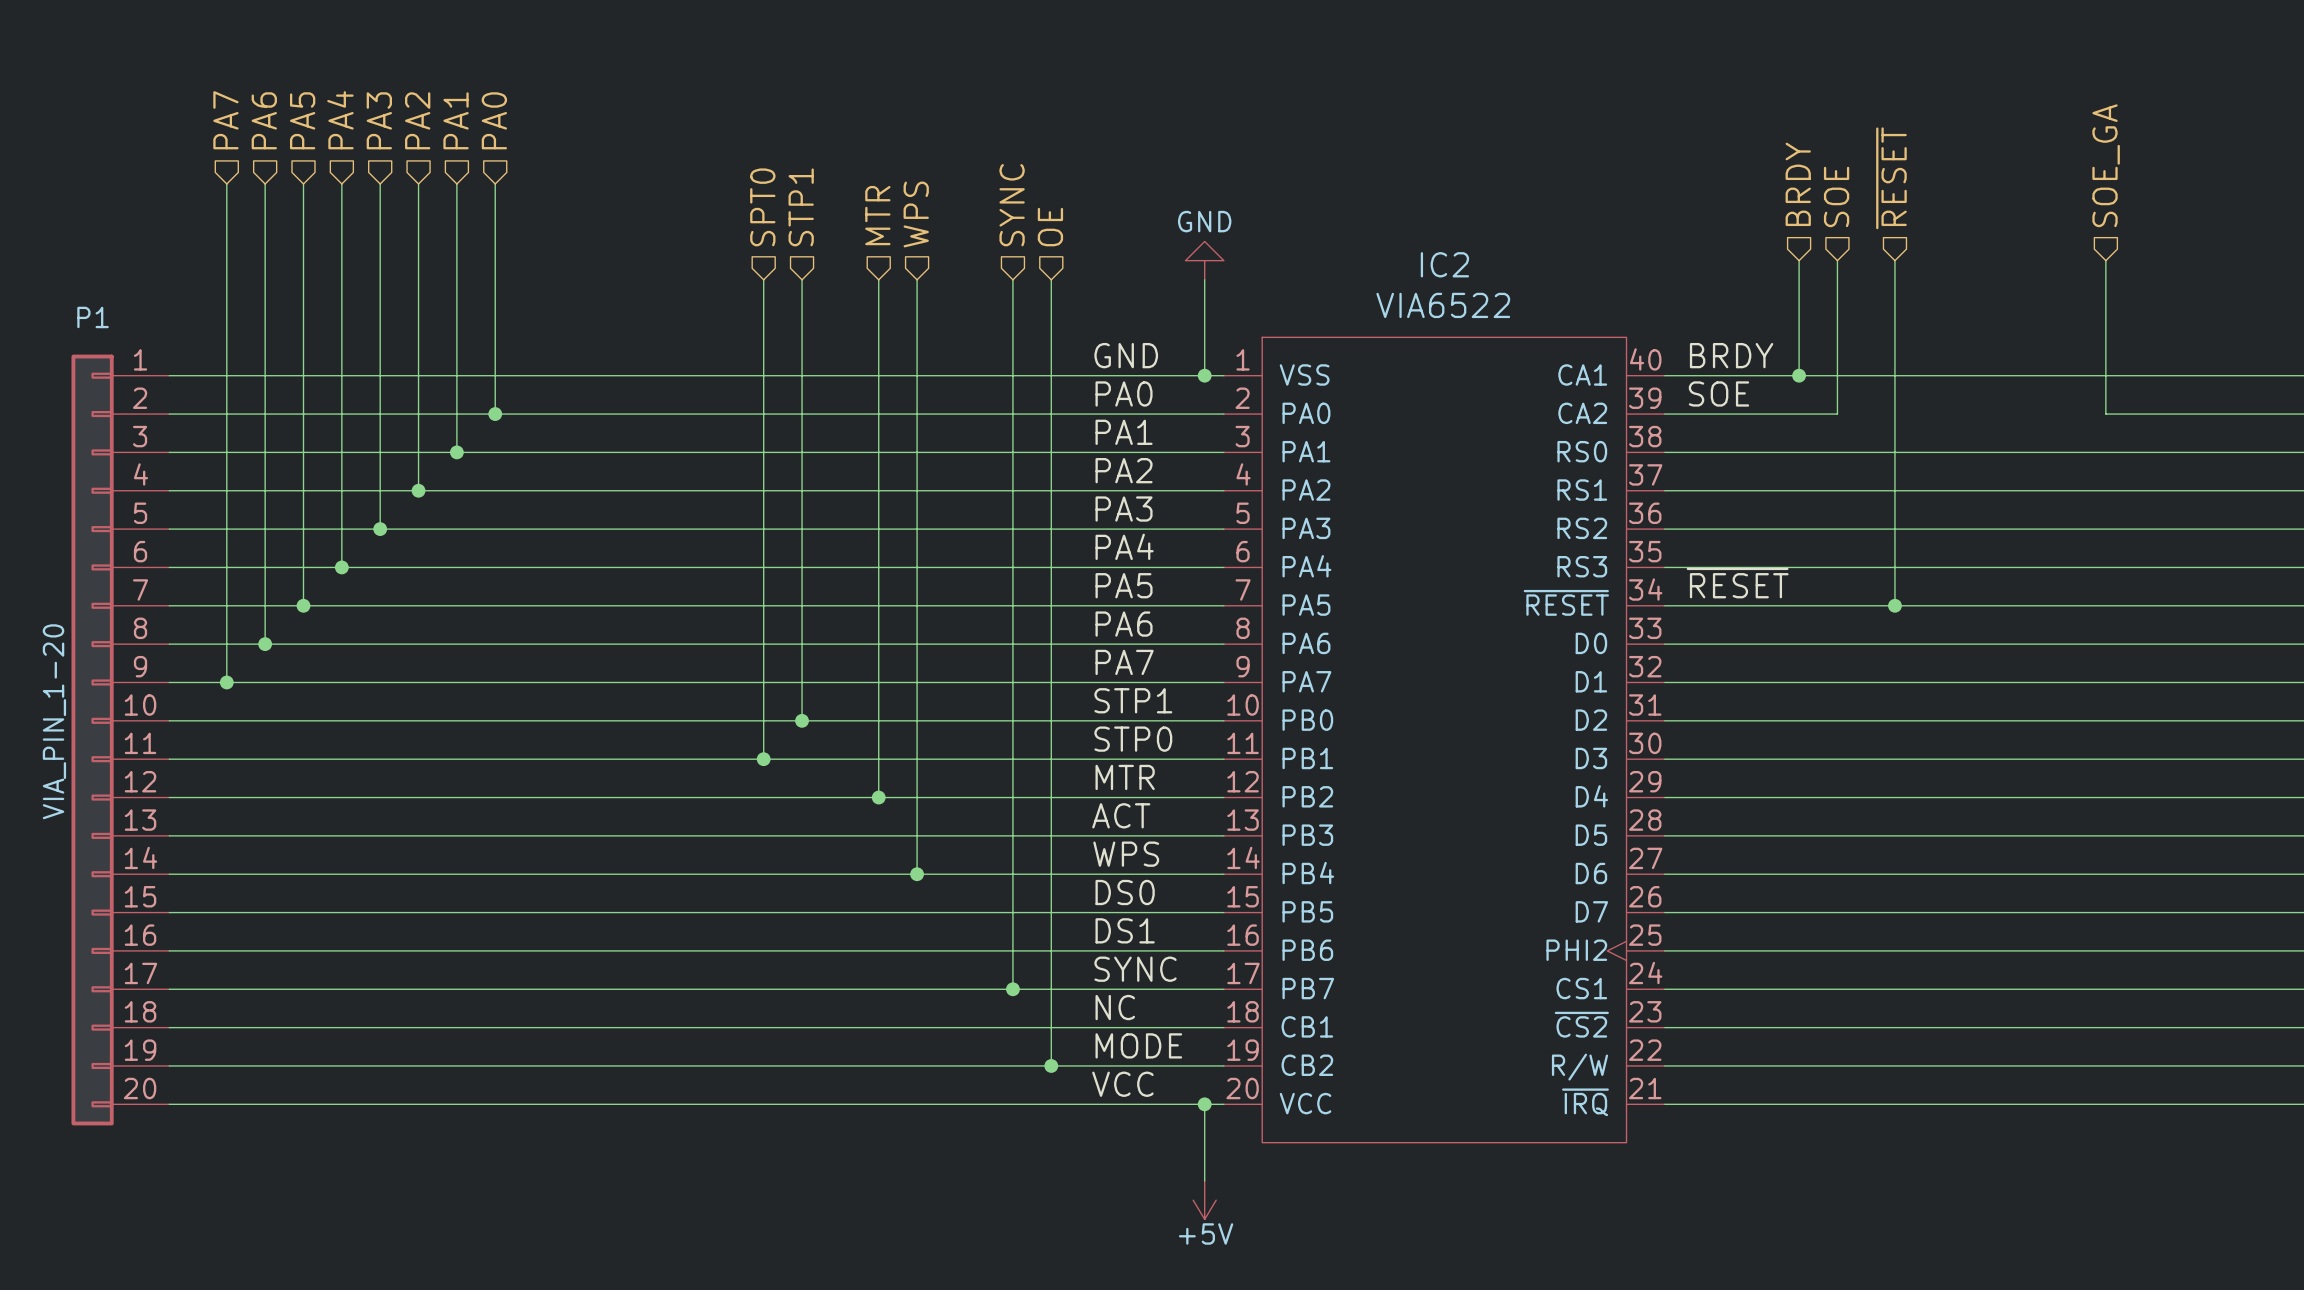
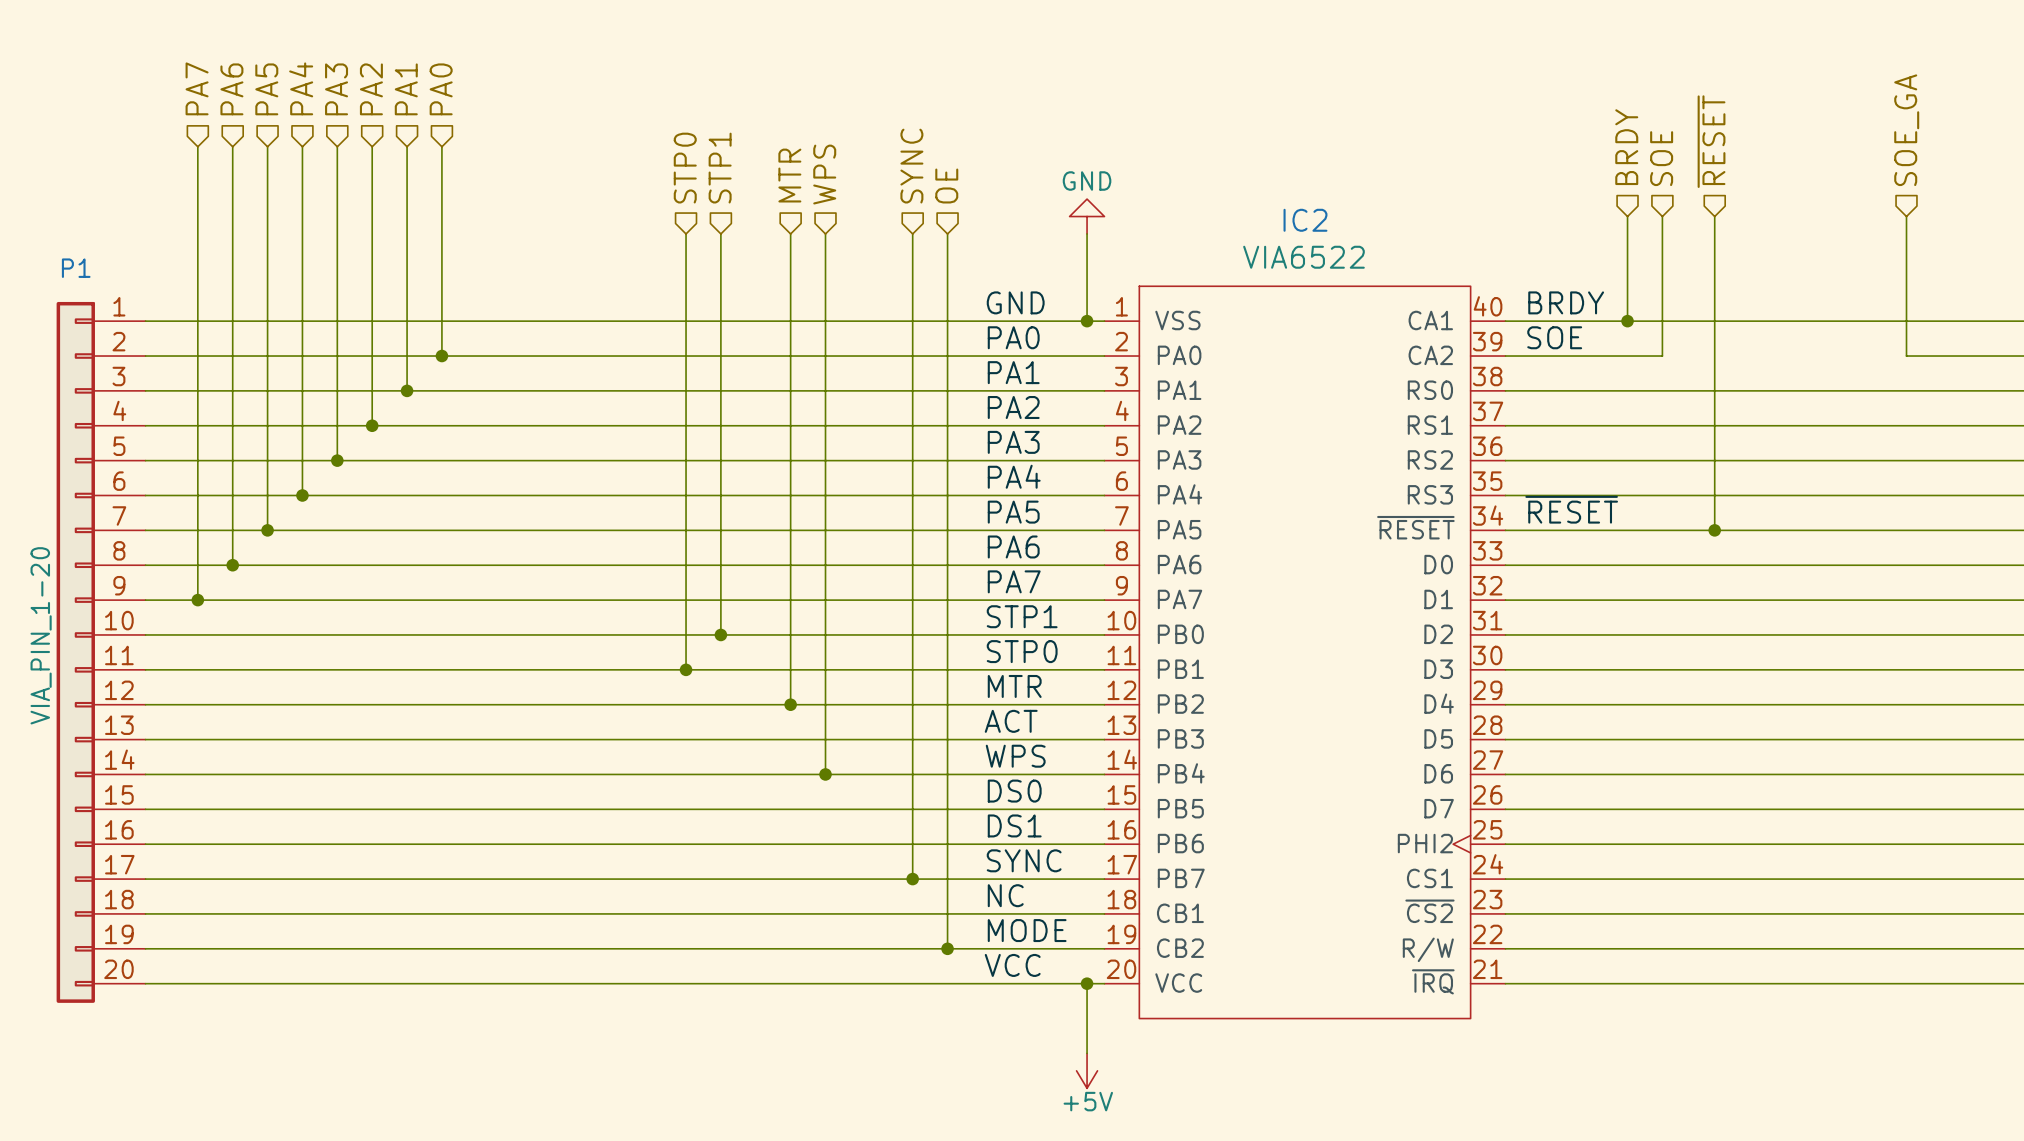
hierarchical label: SPT0 (762, 207) -> STP0 (685, 168)

